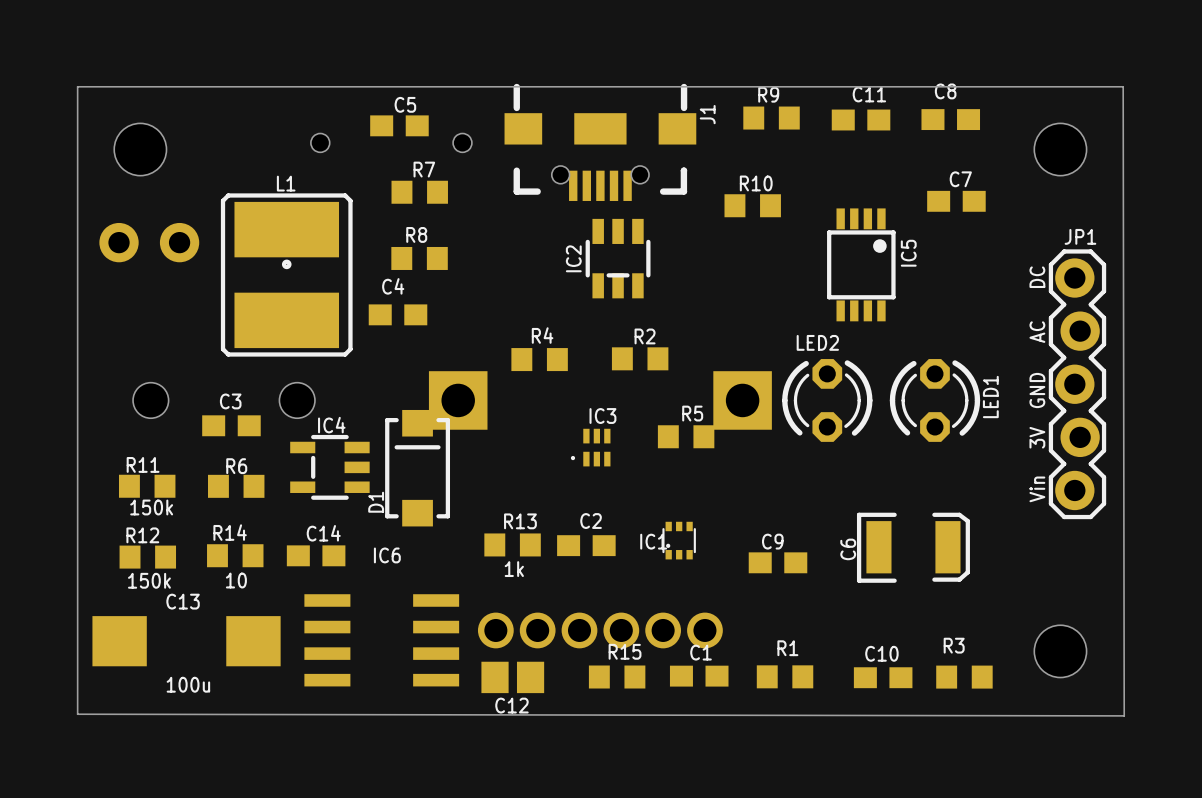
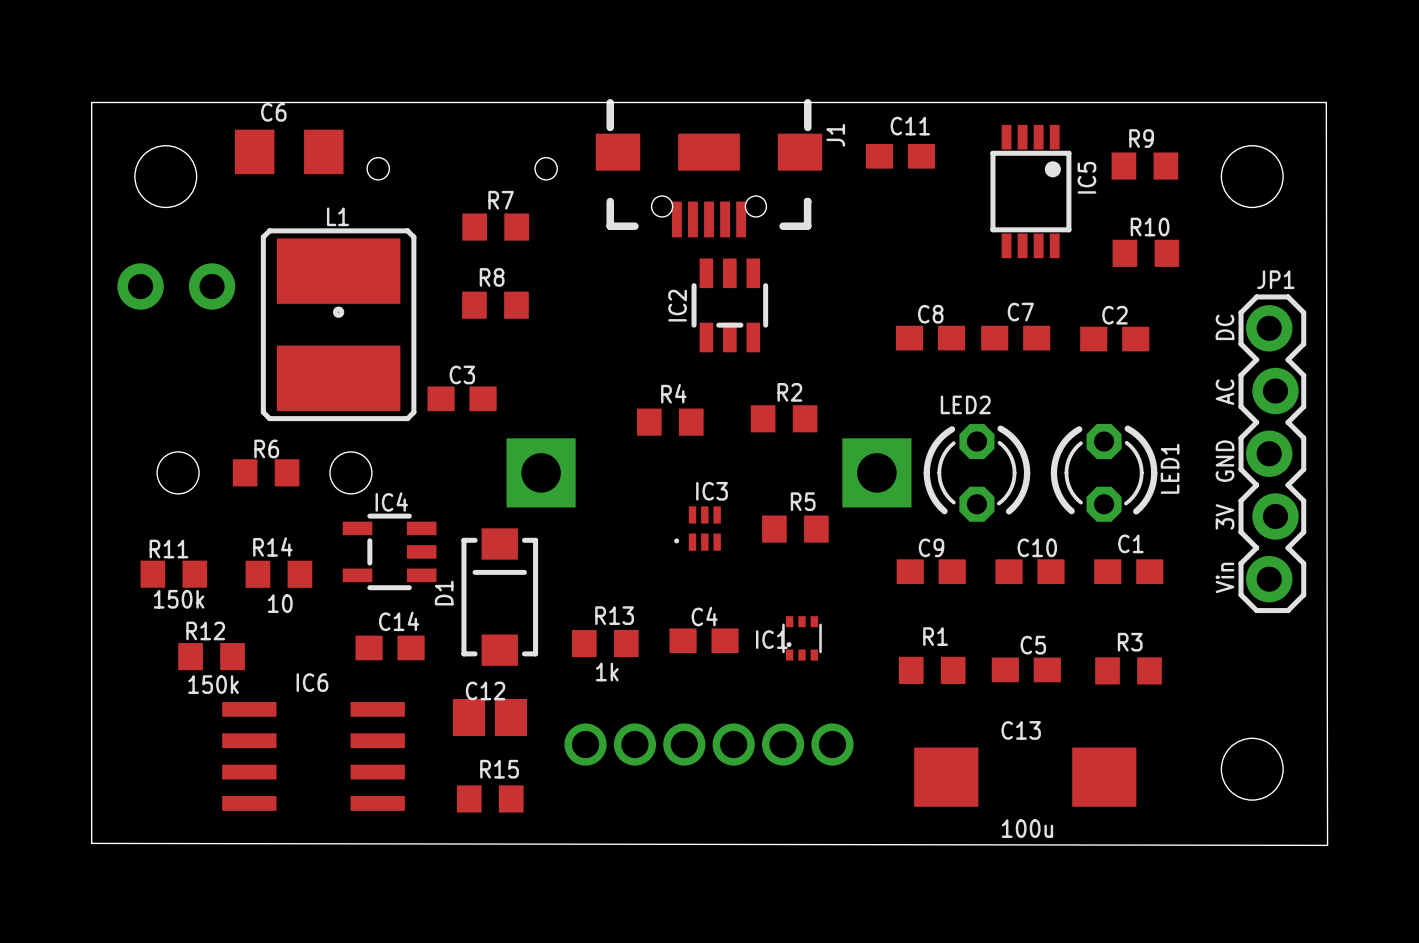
C8 name position: C8 (945, 91) -> C8 (930, 314)
R9 position: (771, 118) -> (1144, 166)
C8 position: (950, 119) -> (930, 338)
C11 position: (861, 120) -> (900, 156)
C5 position: (399, 125) -> (1026, 669)
C7 position: (956, 201) -> (1015, 338)
R10 position: (752, 205) -> (1145, 253)
IC5 position: (861, 264) -> (1030, 191)
C4 name position: C4 (393, 286) -> C4 (704, 616)
C4 position: (398, 314) -> (704, 640)
R2 position: (640, 358) -> (784, 418)
R4 position: (539, 359) -> (670, 422)
R6: none -> (266, 472)
C3 name position: C3 (230, 401) -> C3 (462, 374)
C3 position: (231, 425) -> (462, 398)
R5 position: (686, 436) -> (795, 529)
R6 name: R6 (236, 466) -> R14 (272, 546)
D1 position: (417, 468) -> (499, 597)
R6 value: none -> 10 (280, 603)
C6 footprint: [856, 512, 970, 583] -> [234, 129, 344, 175]
C2 name position: C2 (591, 521) -> C2 (1114, 315)
C9 name position: C9 (772, 541) -> C9 (931, 547)
C2 position: (586, 545) -> (1114, 339)
C6 name position: C6 (848, 549) -> C6 (273, 112)
R14: 10 (235, 555) -> none
C14 position: (316, 555) -> (390, 647)
IC6 name position: IC6 (387, 555) -> IC6 (312, 682)
R12 position: (147, 557) -> (211, 656)
C9 position: (778, 562) -> (931, 571)
IC6 position: (381, 640) -> (313, 756)
C13 position: (186, 641) -> (1025, 777)
R3 name position: R3 (954, 645) -> R3 (1130, 642)
C10 name position: C10 (881, 653) -> C10 (1037, 547)
C1 position: (699, 676) -> (1128, 571)
R1 position: (785, 676) -> (932, 670)
C12 position: (512, 677) -> (489, 717)
R15 position: (617, 677) -> (490, 798)
C10 position: (883, 677) -> (1030, 571)
R3 position: (964, 677) -> (1128, 670)
C12 name position: C12 (511, 705) -> C12 (485, 690)

